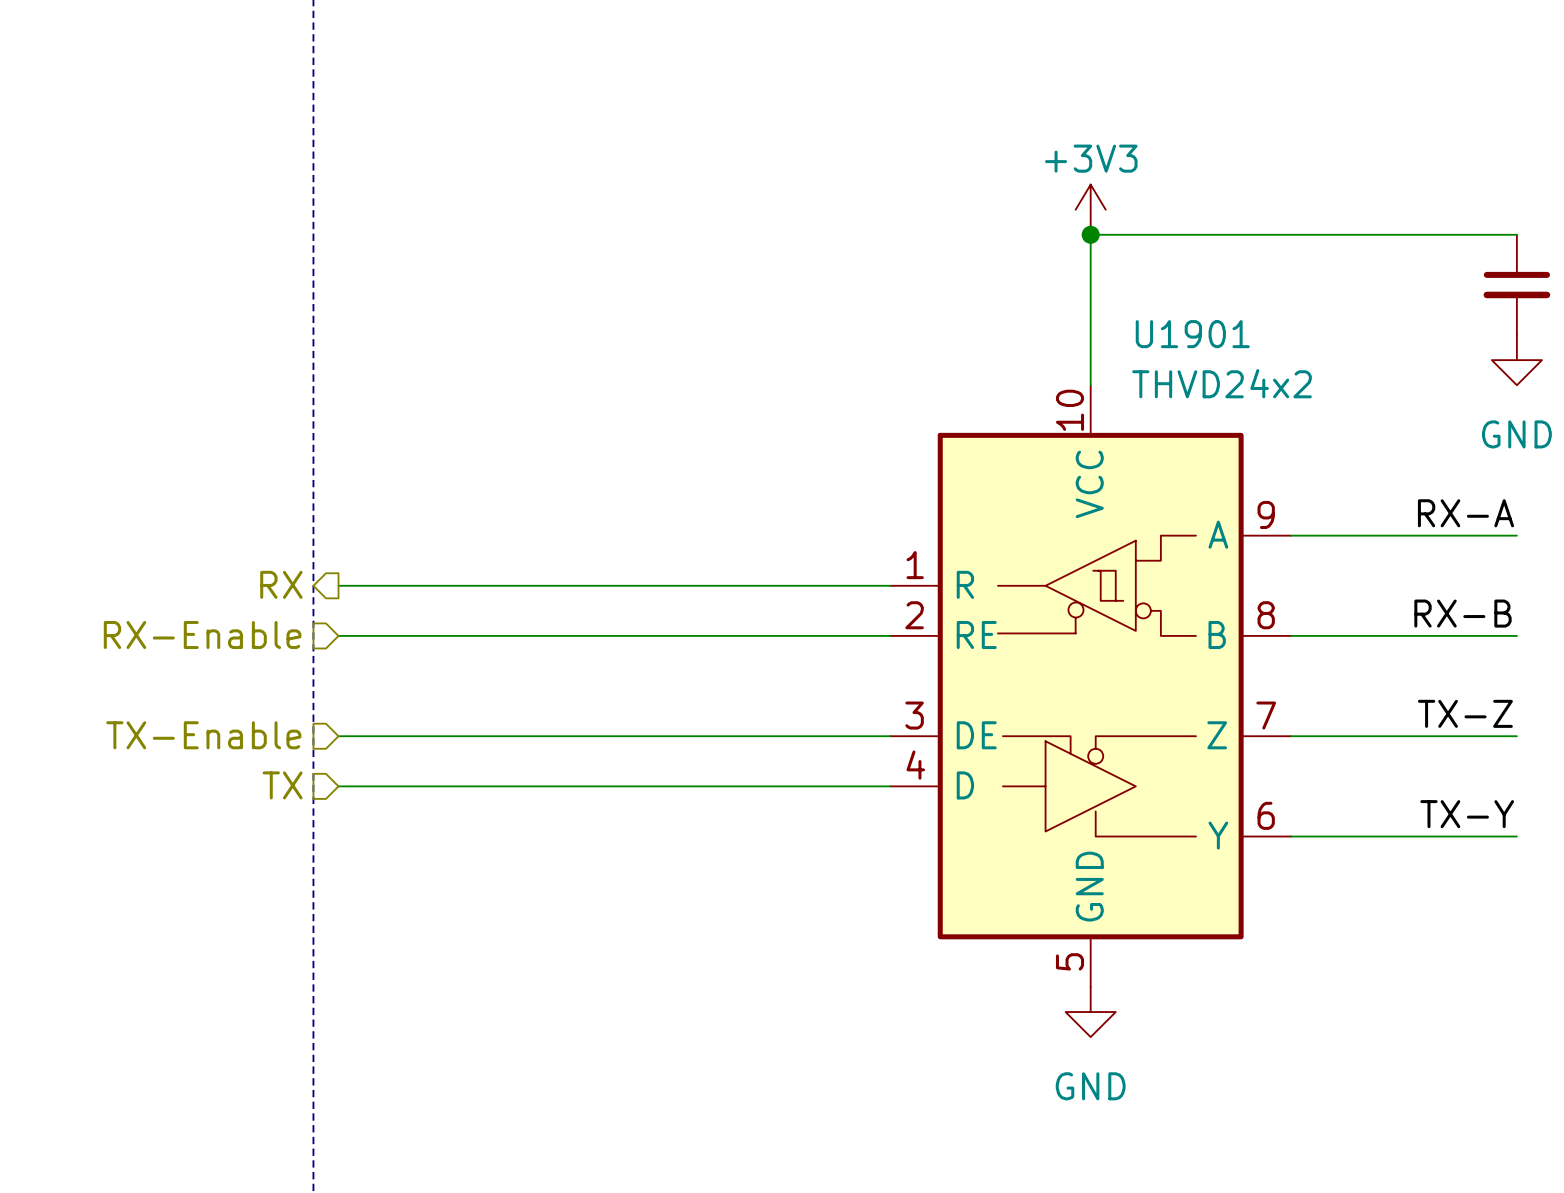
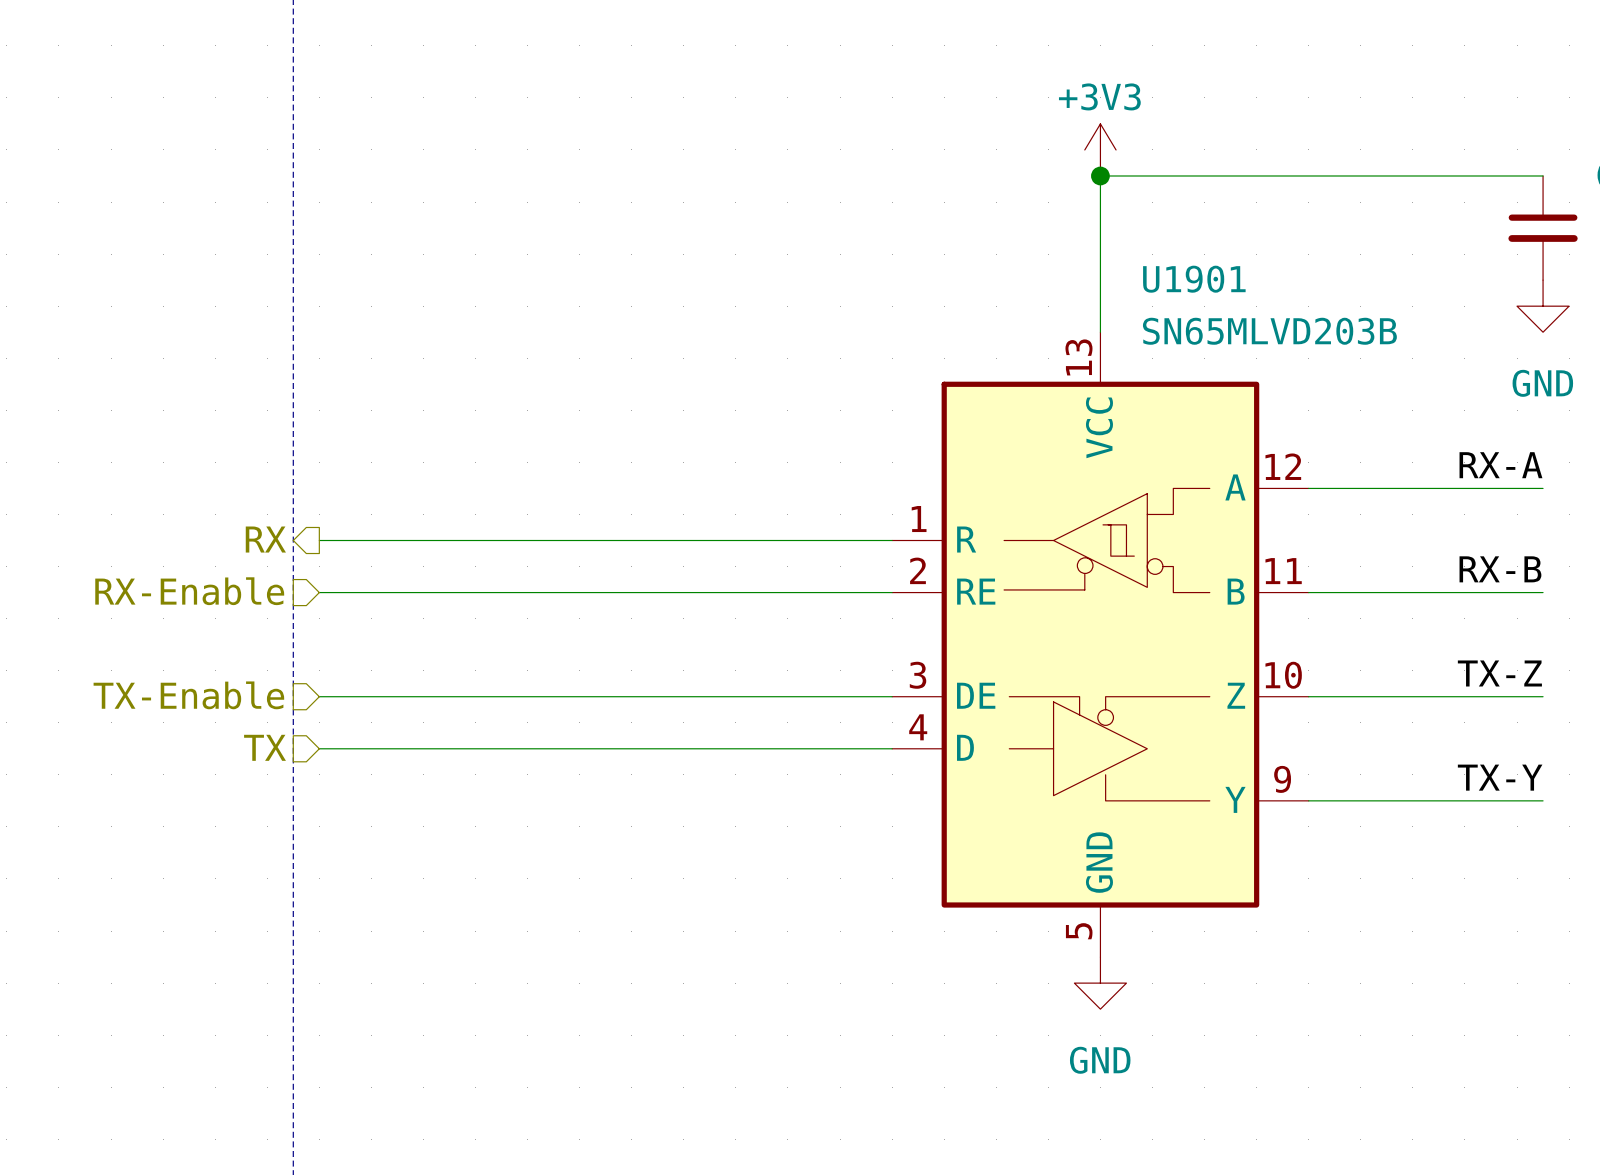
U1901 value: THVD24x2 (1222, 383) -> SN65MLVD203B (1269, 331)
U1901 pin number: 10 (1070, 410) -> 13 (1078, 357)
U1901 pin number: 9 (1266, 514) -> 12 (1283, 466)
U1901 pin number: 8 (1266, 615) -> 11 (1283, 571)
U1901 pin number: 7 (1266, 715) -> 10 (1283, 675)
U1901 pin number: 6 (1266, 815) -> 9 (1282, 779)

